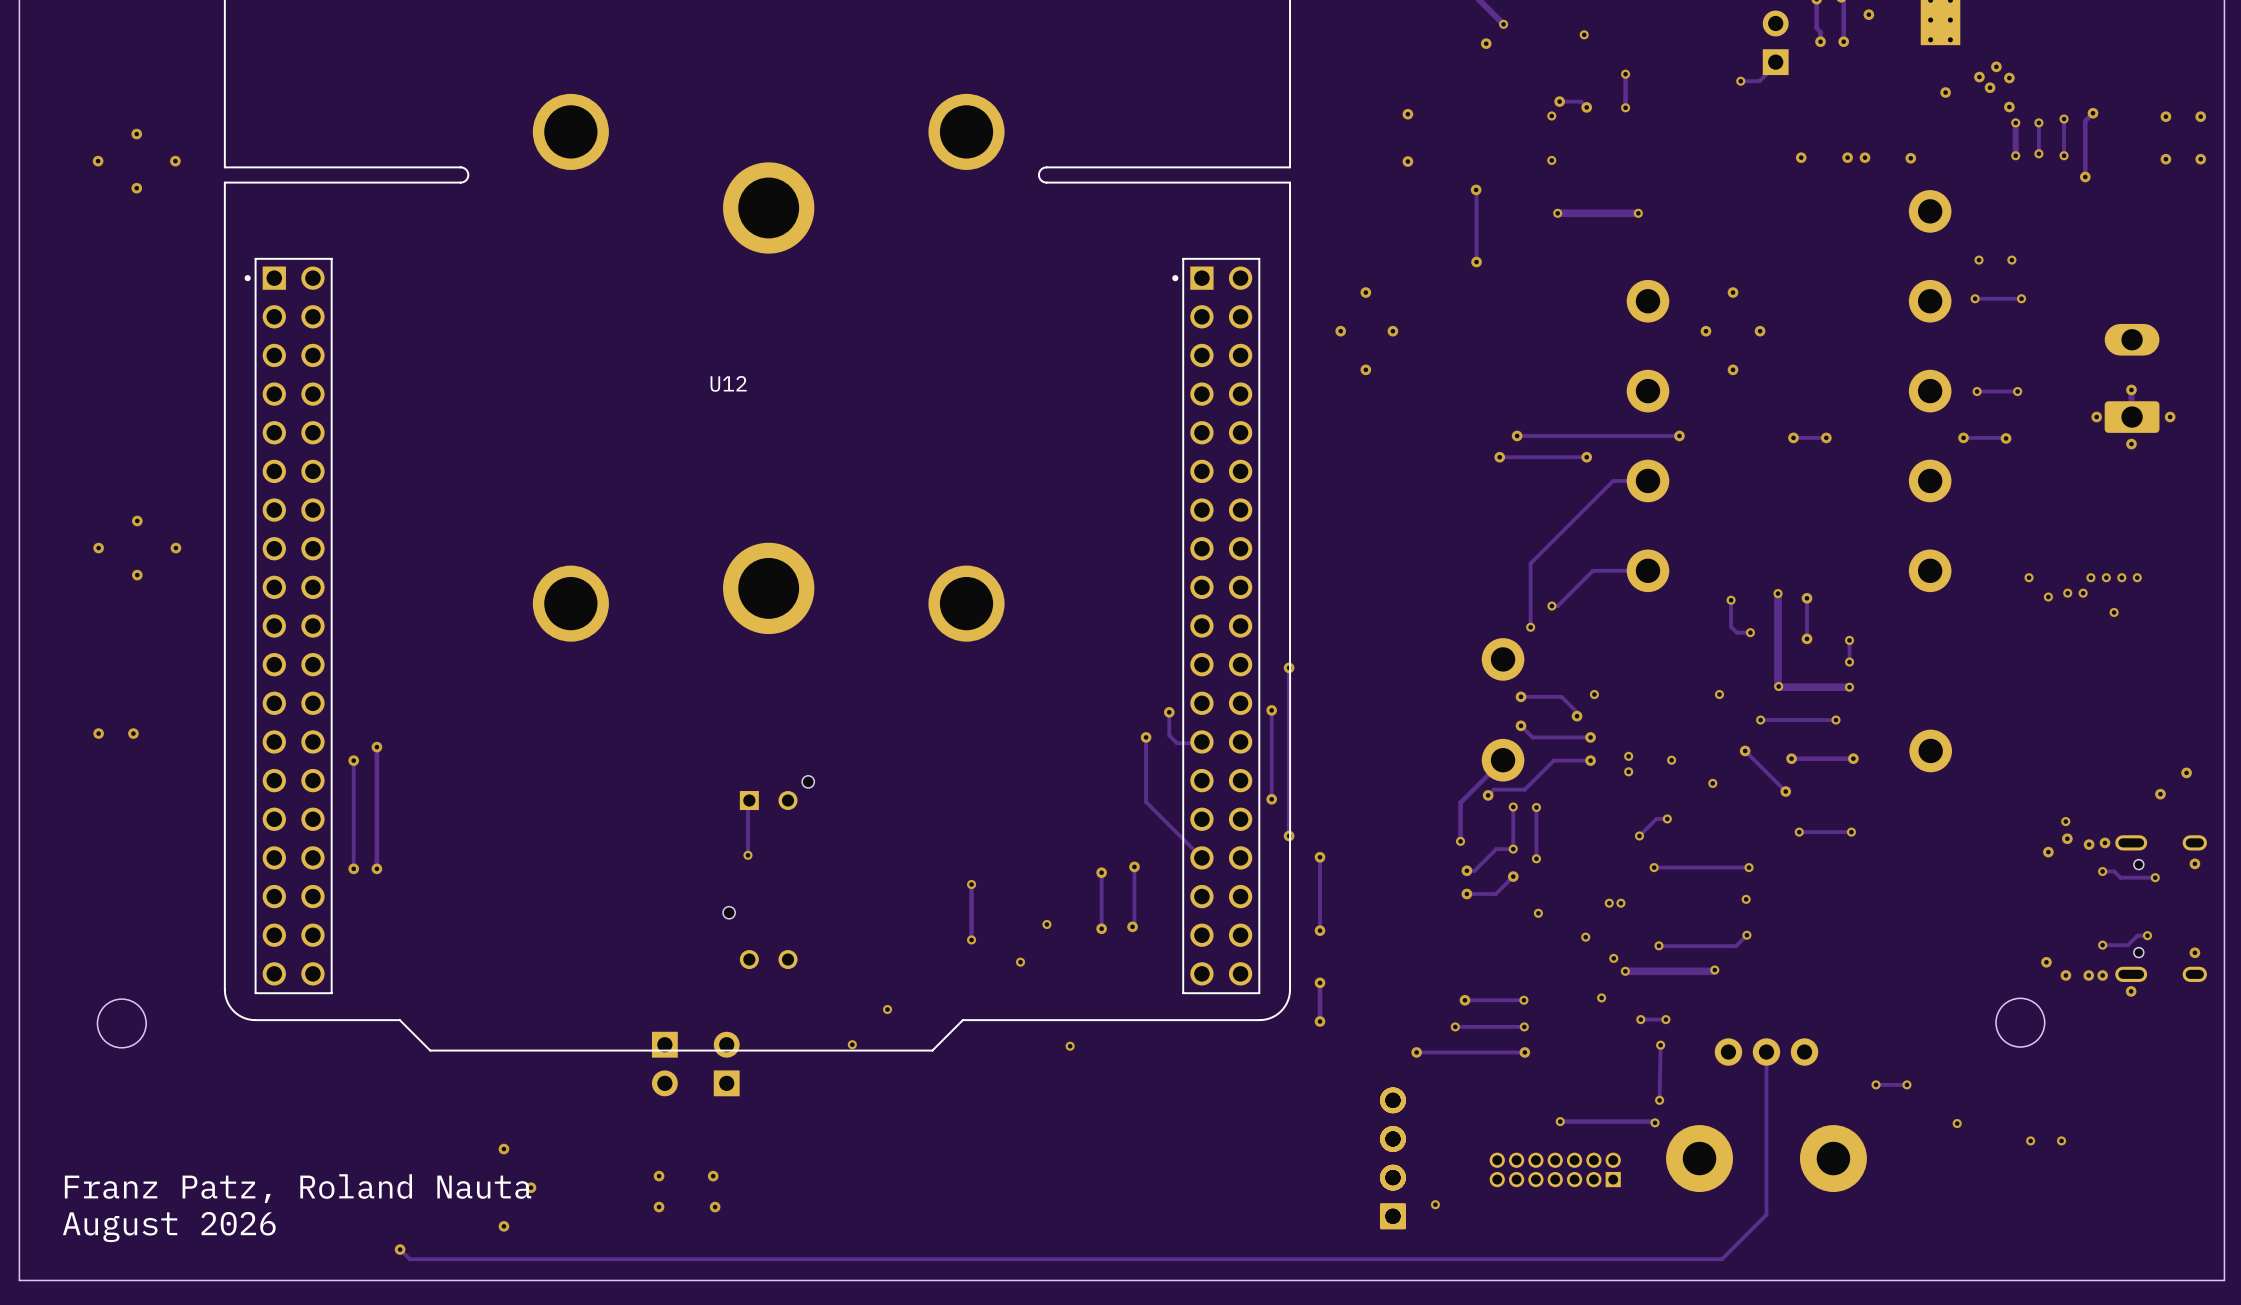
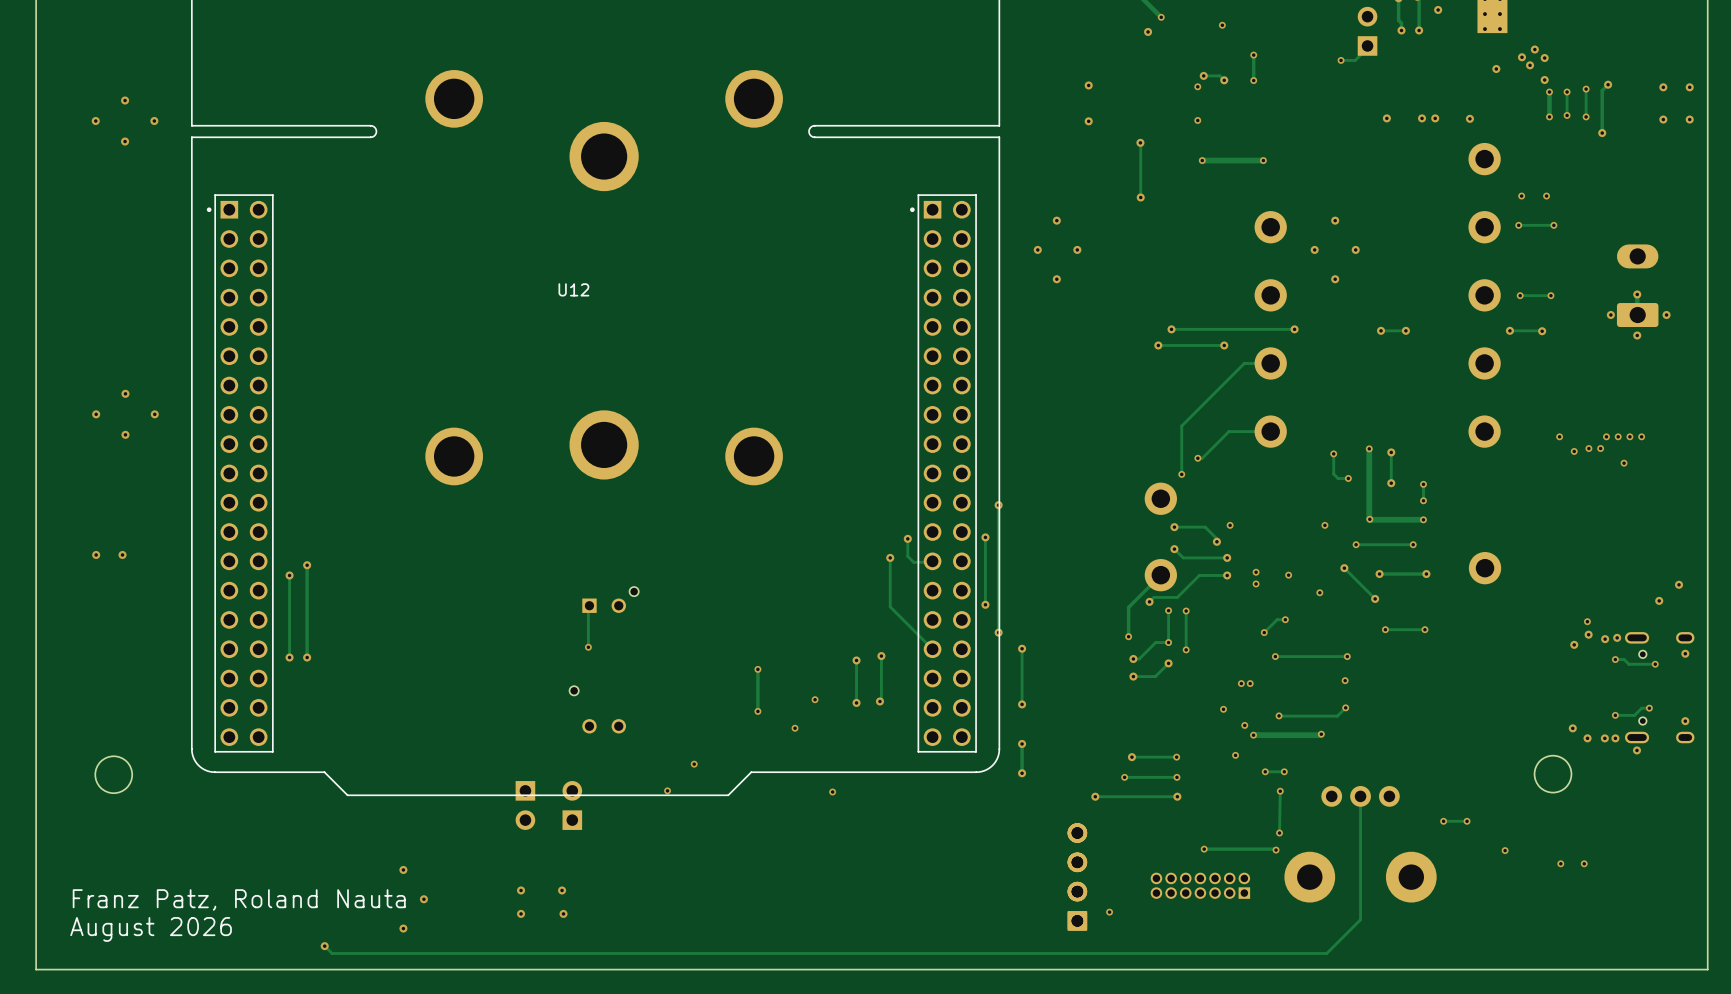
via: (1538, 913) -> none

